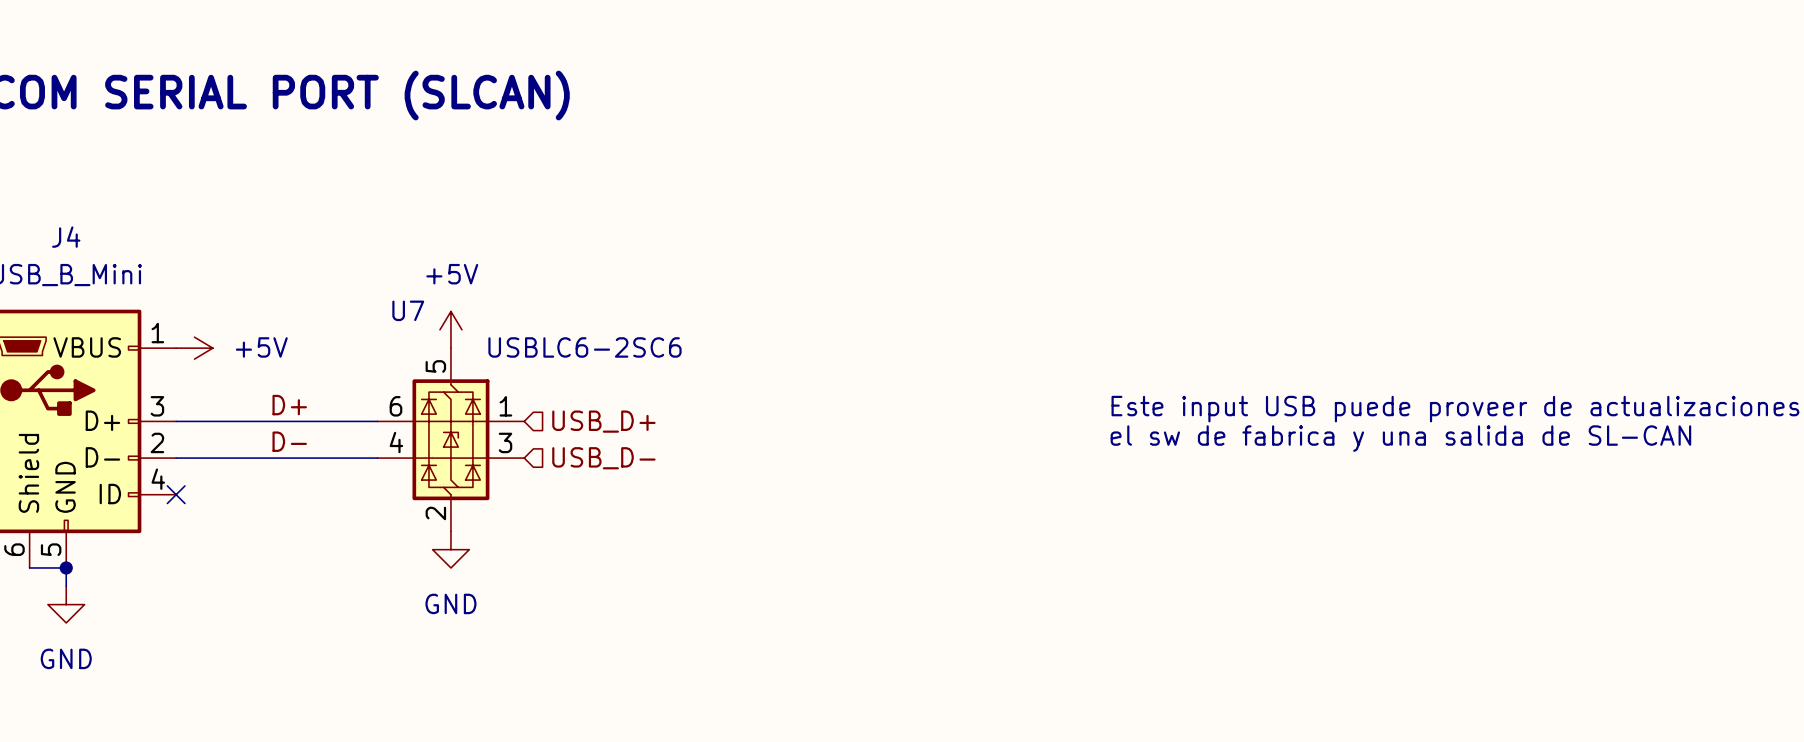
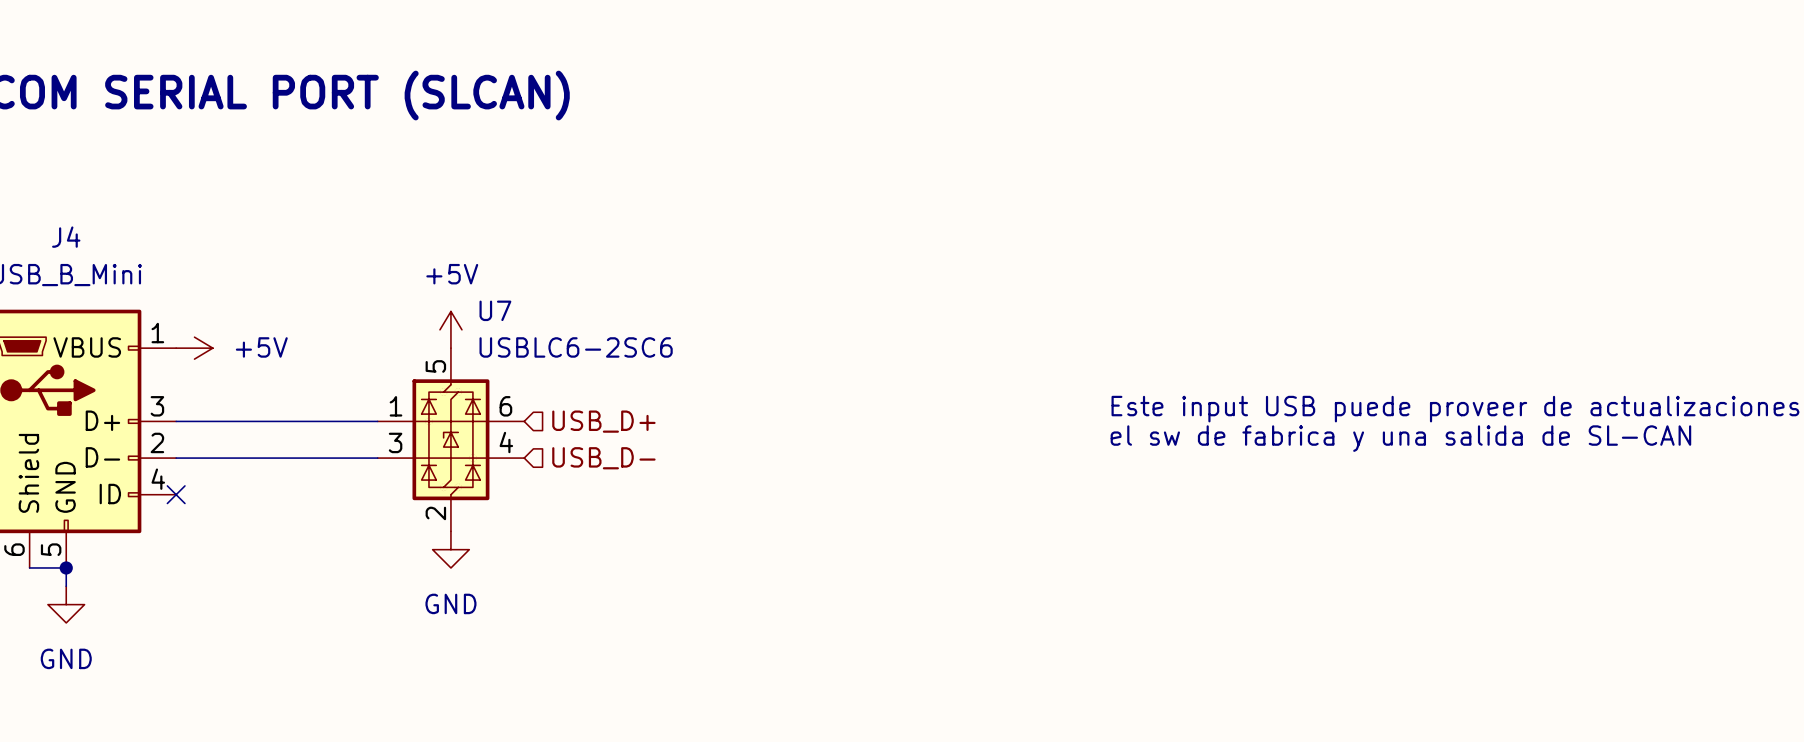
label: D+ (289, 405) -> none
U7 flip: as is (450, 439) -> left-right (450, 439)
label: D- (289, 441) -> none

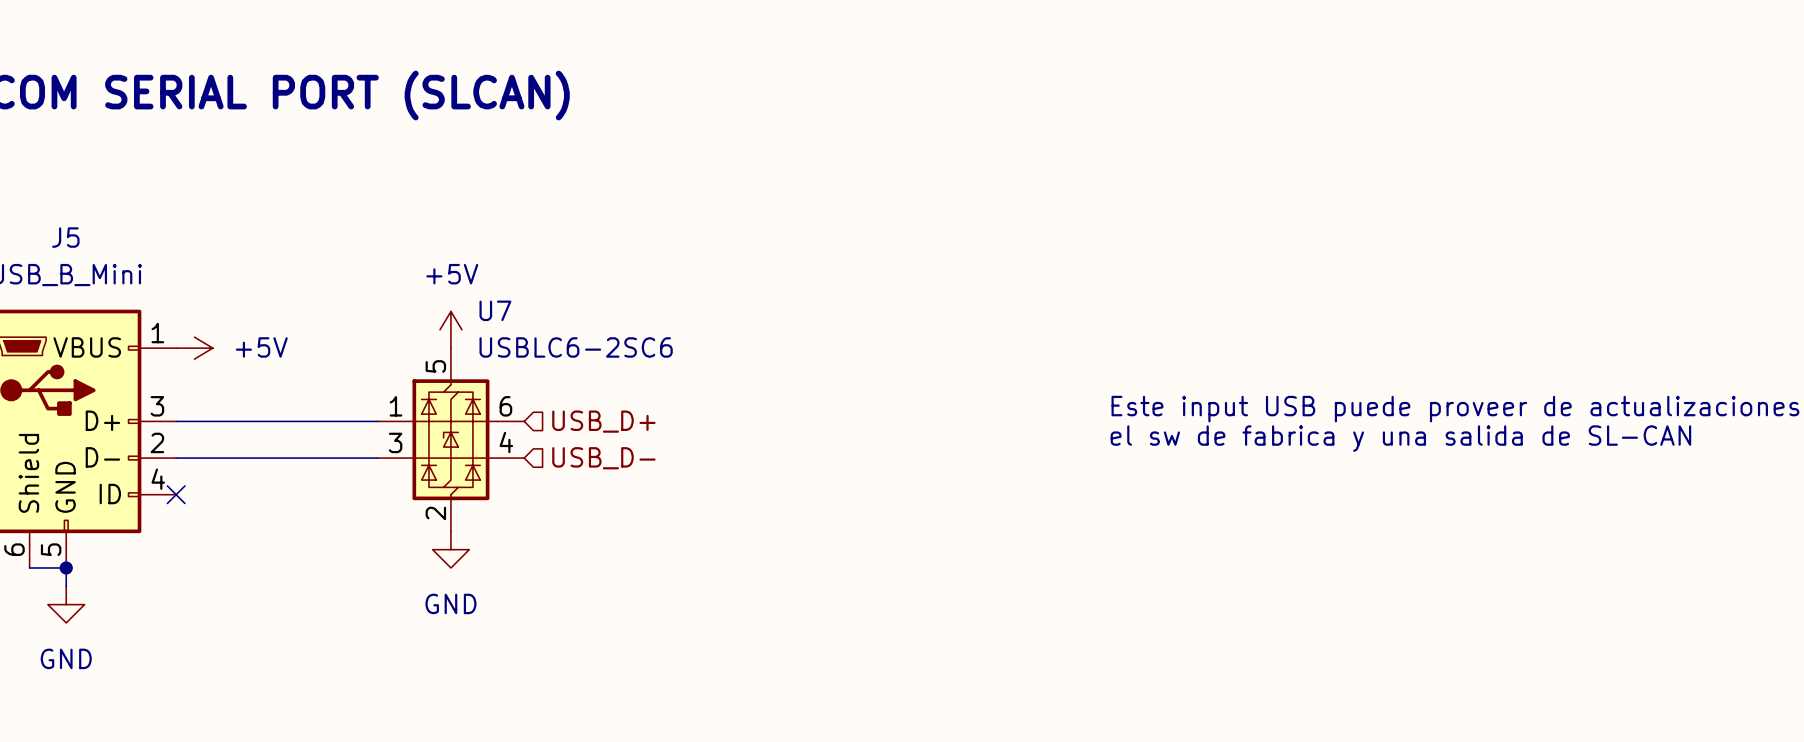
J4 name: J4 (66, 237) -> J5 (65, 237)

